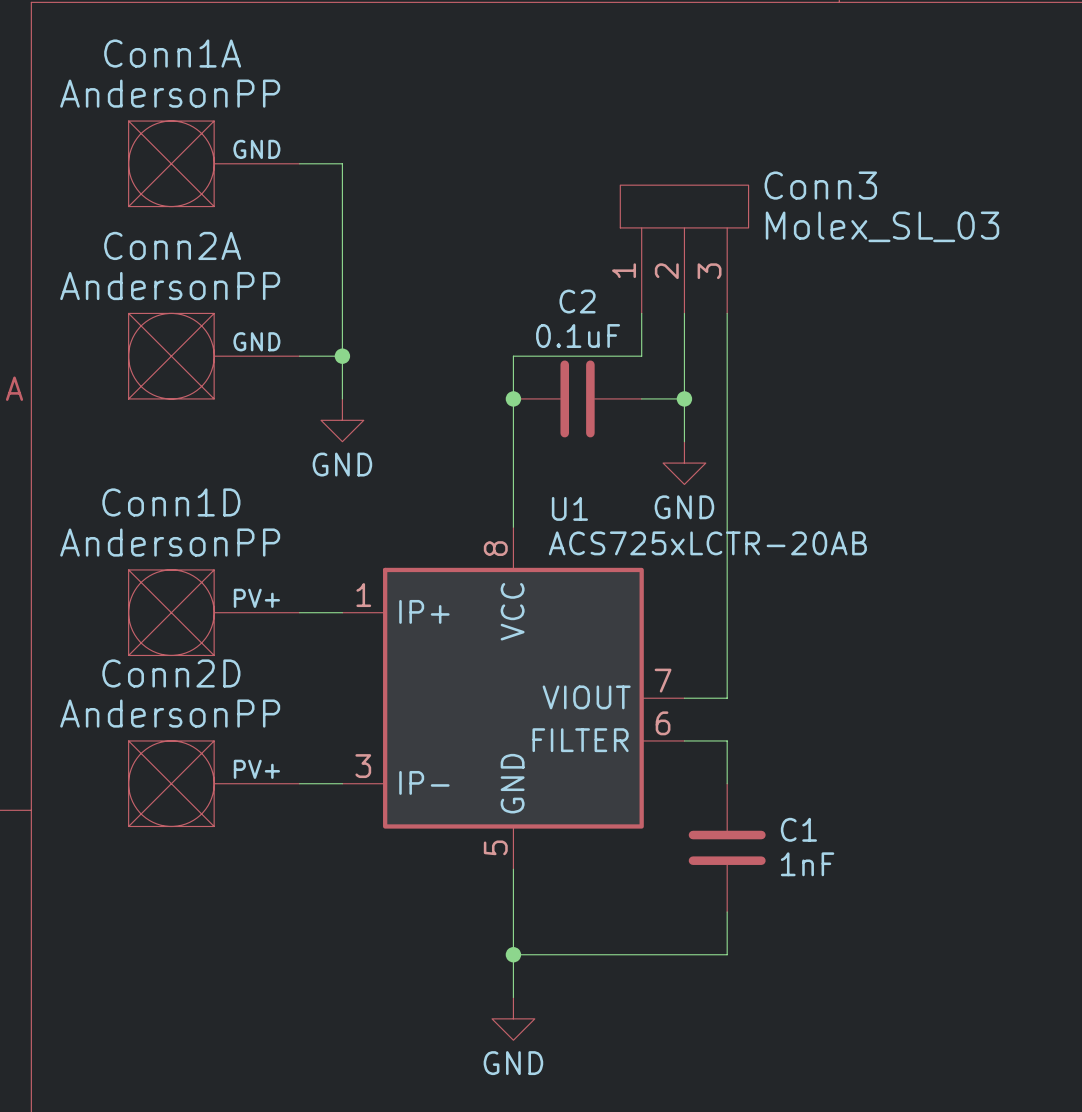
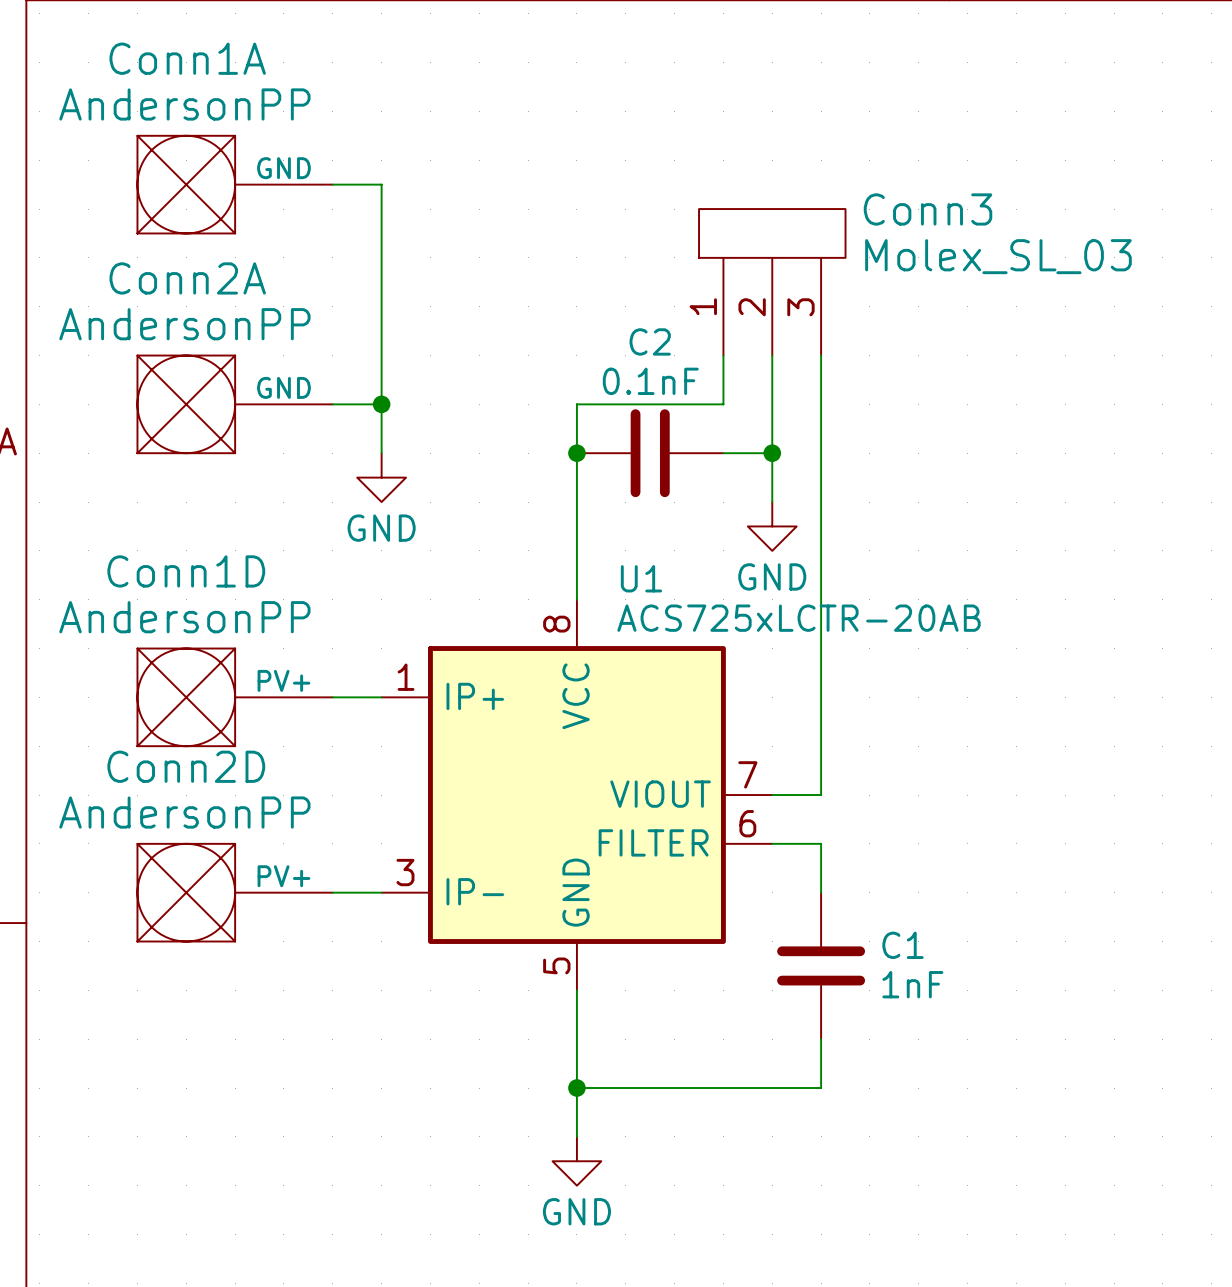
C2 value: 0.1uF (578, 336) -> 0.1nF (650, 381)

